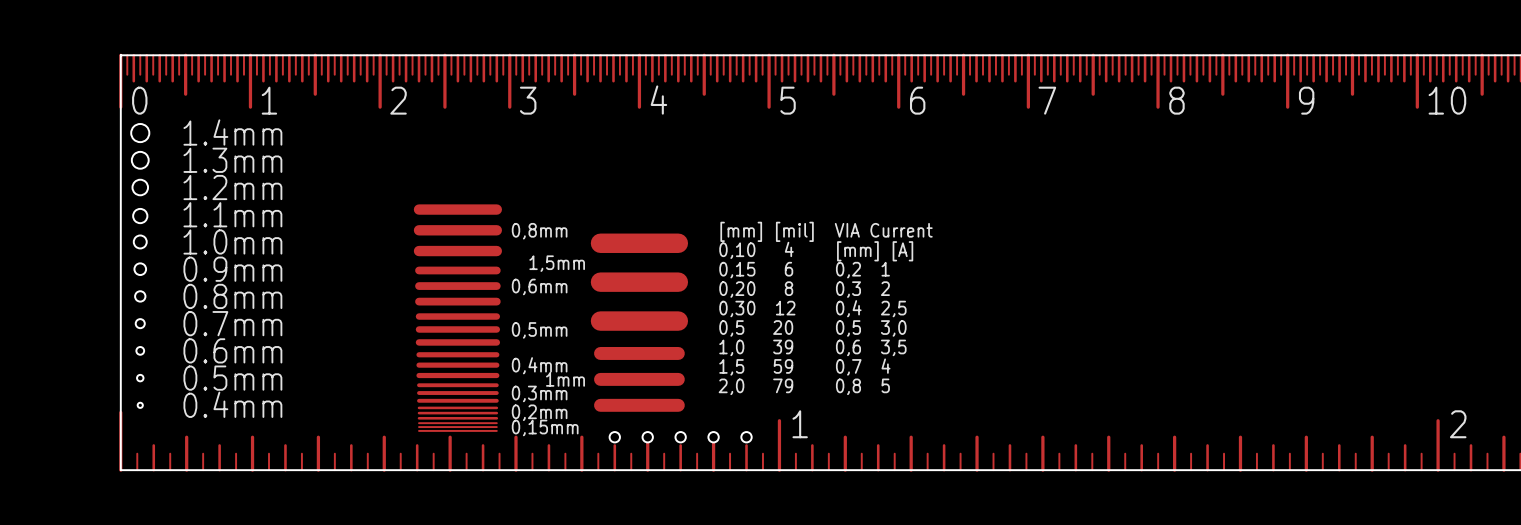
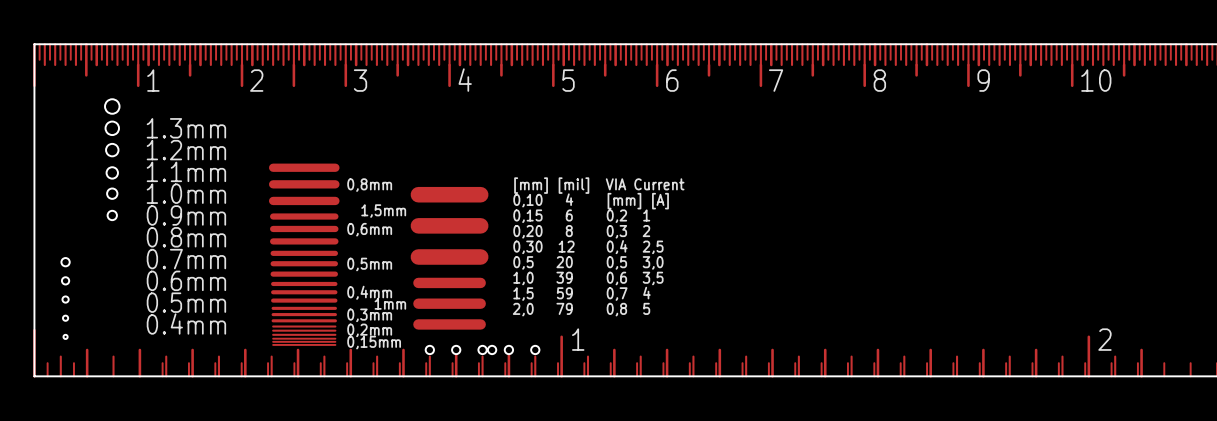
top track: none -> (34, 44) (34, 85)
top track: none -> (39, 44) (39, 59)
top track: none -> (44, 44) (44, 65)
top track: none -> (50, 44) (50, 59)
top track: none -> (55, 44) (55, 65)
top track: none -> (60, 44) (60, 59)
top track: none -> (65, 44) (65, 65)
top track: none -> (70, 44) (70, 59)
top track: none -> (81, 44) (81, 59)
top track: none -> (86, 44) (86, 75)
top track: none -> (91, 44) (91, 59)
board edge: (120, 55) (120, 470) -> (96, 44) (34, 44) (34, 376) (96, 376)
top track: (120, 81) (120, 107) -> (75, 44) (75, 65)
top track: (185, 81) (185, 94) -> none
top track: (250, 81) (250, 107) -> (138, 65) (138, 85)
top track: (315, 81) (315, 94) -> (190, 65) (190, 75)
top track: (380, 81) (380, 107) -> (242, 65) (242, 85)
top track: (444, 81) (444, 107) -> (293, 65) (293, 85)
top track: (509, 81) (509, 107) -> (345, 65) (345, 85)
top track: (574, 81) (574, 94) -> (397, 65) (397, 75)
top track: (639, 81) (639, 107) -> (449, 65) (449, 85)
top track: (704, 81) (704, 94) -> (501, 65) (501, 75)
top track: (769, 81) (769, 107) -> (553, 65) (553, 85)
top track: (833, 81) (833, 94) -> (605, 65) (605, 75)
top track: (898, 81) (898, 107) -> (657, 65) (657, 85)
top track: (963, 81) (963, 94) -> (709, 65) (709, 75)
top track: (1028, 81) (1028, 107) -> (760, 65) (760, 85)
top track: (1093, 81) (1093, 94) -> (812, 65) (812, 75)
top track: (1158, 81) (1158, 107) -> (864, 65) (864, 85)
top track: (1222, 81) (1222, 94) -> (916, 65) (916, 75)
top track: (1287, 81) (1287, 107) -> (968, 65) (968, 85)
top track: (1352, 81) (1352, 94) -> (1020, 65) (1020, 75)
top track: (1417, 81) (1417, 107) -> (1072, 65) (1072, 85)
top track: (1482, 81) (1482, 94) -> (1124, 65) (1124, 75)
text: 0 (139, 100) -> none
text position: 1 (269, 100) -> 1 (153, 80)
text position: 2 (398, 100) -> 2 (256, 80)
text position: 3 (528, 100) -> 3 (360, 80)
text position: 4 (658, 100) -> 4 (465, 80)
text position: 5 (788, 100) -> 5 (568, 80)
text position: 6 (917, 100) -> 6 (672, 80)
text position: 7 (1047, 100) -> 7 (776, 80)
text position: 8 (1176, 100) -> 8 (879, 80)
text position: 9 (1306, 100) -> 9 (983, 80)
text position: 10 (1447, 100) -> 10 (1096, 80)
text: 1.4mm (232, 132) -> none
top track: (419, 209) (496, 209) -> (335, 167) (273, 167)
top track: (419, 230) (496, 230) -> (335, 184) (273, 184)
text position: VIA Current (883, 230) -> VIA Current (645, 184)
text position: 0,8mm (539, 231) -> 0,8mm (369, 185)
text position: [mm] [mil] (767, 231) -> [mm] [mil] (551, 185)
top track: (600, 243) (678, 243) -> (480, 194) (418, 194)
text position: 0,10 4 (756, 250) -> 0,10 4 (543, 200)
top track: (419, 251) (496, 251) -> (335, 200) (273, 200)
text position: [mm] [A] (875, 251) -> [mm] [A] (638, 201)
text position: 1,5mm (557, 263) -> 1,5mm (383, 211)
top track: (419, 270) (496, 270) -> (335, 216) (273, 216)
text position: 0,15 6 (756, 270) -> 0,15 6 (543, 216)
text position: 0,2 1 (862, 270) -> 0,2 1 (628, 216)
top track: (600, 282) (678, 282) -> (480, 225) (418, 225)
top track: (419, 286) (496, 286) -> (335, 228) (273, 228)
text position: 0,6mm (539, 286) -> 0,6mm (369, 229)
text position: 0,20 8 (756, 289) -> 0,20 8 (543, 231)
text position: 0,3 2 (862, 289) -> 0,3 2 (628, 231)
hole position: (140, 296) -> (65, 262)
top track: (419, 301) (496, 301) -> (335, 241) (273, 241)
text position: 0,4 2,5 (871, 308) -> 0,4 2,5 (635, 247)
text position: 0,30 12 (757, 309) -> 0,30 12 (543, 247)
top track: (419, 316) (496, 316) -> (335, 253) (273, 253)
top track: (600, 321) (678, 321) -> (480, 256) (418, 256)
hole position: (140, 323) -> (65, 280)
text position: 0,5 20 (756, 328) -> 0,5 20 (543, 262)
text position: 0,5 3,0 (871, 328) -> 0,5 3,0 (635, 262)
top track: (419, 329) (496, 329) -> (335, 263) (273, 263)
text position: 0,5mm (539, 330) -> 0,5mm (369, 264)
top track: (419, 342) (496, 342) -> (335, 274) (273, 274)
text position: 1,0 39 (756, 347) -> 1,0 39 (543, 278)
text position: 0,6 3,5 (871, 347) -> 0,6 3,5 (635, 278)
hole position: (140, 350) -> (65, 299)
top track: (600, 353) (678, 353) -> (480, 282) (418, 282)
top track: (419, 354) (496, 354) -> (335, 283) (273, 283)
top track: (419, 365) (496, 365) -> (335, 292) (273, 292)
text position: 0,4mm (539, 365) -> 0,4mm (369, 292)
text position: 1,5 59 (756, 367) -> 1,5 59 (543, 294)
text position: 0,7 4 (863, 367) -> 0,7 4 (628, 293)
top track: (419, 375) (496, 375) -> (335, 300) (273, 300)
hole position: (140, 378) -> (65, 318)
text position: 1mm (565, 379) -> 1mm (390, 303)
top track: (600, 379) (678, 379) -> (480, 303) (418, 303)
top track: (419, 385) (496, 385) -> (335, 308) (273, 308)
text position: 2,0 79 (755, 386) -> 2,0 79 (542, 309)
text position: 0,8 5 (862, 386) -> 0,8 5 (628, 309)
top track: (419, 393) (496, 393) -> (335, 314) (273, 314)
text position: 0,3mm (539, 393) -> 0,3mm (369, 315)
top track: (419, 400) (496, 400) -> (335, 320) (273, 320)
hole position: (140, 405) -> (65, 336)
top track: (600, 405) (678, 405) -> (480, 324) (418, 324)
top track: (419, 407) (496, 407) -> (335, 326) (273, 326)
top track: (120, 412) (120, 470) -> (34, 330) (34, 376)
text position: 0,2mm (539, 412) -> 0,2mm (369, 330)
top track: (419, 413) (496, 413) -> (335, 330) (273, 330)
top track: (419, 418) (496, 418) -> (335, 334) (273, 334)
top track: (779, 420) (779, 470) -> (561, 336) (561, 376)
top track: (1438, 420) (1438, 470) -> (1088, 336) (1088, 376)
top track: (419, 423) (496, 423) -> (335, 338) (273, 338)
text position: 1 (800, 424) -> 1 (578, 339)
text position: 2 (1458, 424) -> 2 (1104, 339)
top track: (419, 427) (496, 427) -> (335, 341) (273, 341)
text position: 0,15mm (545, 427) -> 0,15mm (374, 342)
top track: (419, 430) (496, 430) -> (335, 344) (273, 344)
top track: (186, 437) (186, 470) -> (87, 349) (87, 376)
top track: (252, 437) (252, 470) -> (139, 349) (139, 376)
top track: (318, 437) (318, 470) -> (192, 349) (192, 376)
top track: (384, 437) (384, 470) -> (245, 349) (245, 376)
top track: (450, 437) (450, 470) -> (298, 349) (298, 376)
top track: (515, 437) (515, 470) -> (350, 349) (350, 376)
hole: none -> (429, 349)
hole: none -> (456, 349)
top track: (581, 437) (581, 470) -> (403, 349) (403, 376)
hole: none -> (482, 349)
hole: none -> (508, 349)
top track: (647, 437) (647, 470) -> (456, 349) (456, 376)
hole: (647, 437) -> none
hole: none -> (535, 349)
hole: (680, 437) -> none
top track: (713, 437) (713, 470) -> (508, 349) (508, 376)
hole: (713, 437) -> none
hole: (746, 437) -> none
top track: (845, 437) (845, 470) -> (614, 349) (614, 376)
top track: (911, 437) (911, 470) -> (667, 349) (667, 376)
top track: (977, 437) (977, 470) -> (719, 349) (719, 376)
top track: (1042, 437) (1042, 470) -> (772, 349) (772, 376)
top track: (1108, 437) (1108, 470) -> (825, 349) (825, 376)
top track: (1174, 437) (1174, 470) -> (877, 349) (877, 376)
top track: (1240, 437) (1240, 470) -> (930, 349) (930, 376)
top track: (1306, 437) (1306, 470) -> (983, 349) (983, 376)
top track: (1372, 437) (1372, 470) -> (1036, 349) (1036, 376)
top track: (1503, 437) (1503, 470) -> (1141, 349) (1141, 376)
top track: (153, 445) (153, 470) -> (60, 356) (60, 376)
top track: (219, 445) (219, 470) -> (113, 356) (113, 376)
top track: (285, 445) (285, 470) -> (166, 356) (166, 376)
top track: (351, 445) (351, 470) -> (218, 356) (218, 376)
top track: (417, 445) (417, 470) -> (271, 356) (271, 376)
top track: (483, 445) (483, 470) -> (324, 356) (324, 376)
top track: (548, 445) (548, 470) -> (377, 356) (377, 376)
top track: (614, 445) (614, 470) -> (429, 356) (429, 376)
top track: (680, 445) (680, 470) -> (482, 356) (482, 376)
top track: (746, 445) (746, 470) -> (535, 356) (535, 376)
top track: (812, 445) (812, 470) -> (588, 356) (588, 376)
top track: (878, 445) (878, 470) -> (640, 356) (640, 376)
top track: (944, 445) (944, 470) -> (693, 356) (693, 376)
top track: (1009, 445) (1009, 470) -> (746, 356) (746, 376)
top track: (1075, 445) (1075, 470) -> (798, 356) (798, 376)
top track: (1141, 445) (1141, 470) -> (851, 356) (851, 376)
top track: (1207, 445) (1207, 470) -> (904, 356) (904, 376)
top track: (1273, 445) (1273, 470) -> (957, 356) (957, 376)
top track: (1339, 445) (1339, 470) -> (1009, 356) (1009, 376)
top track: (1405, 445) (1405, 470) -> (1062, 356) (1062, 376)
top track: (1471, 445) (1471, 470) -> (1115, 356) (1115, 376)
top track: (137, 453) (137, 470) -> (47, 363) (47, 376)
top track: (170, 453) (170, 470) -> (73, 363) (73, 376)

